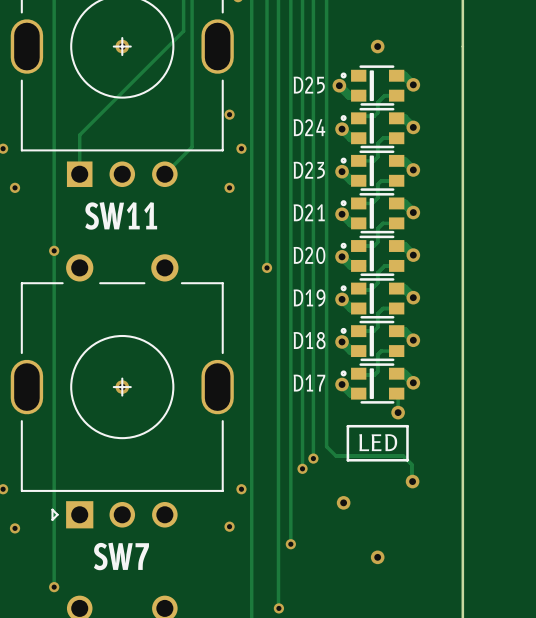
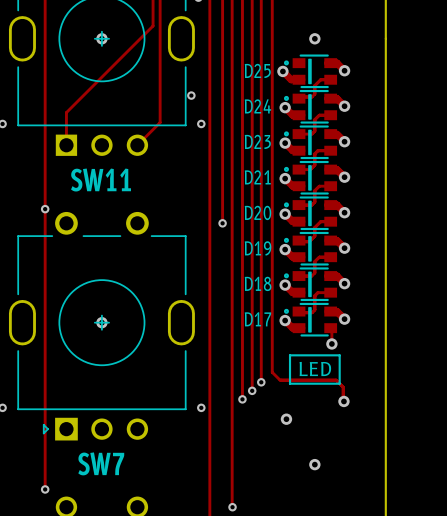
via: (15, 187) -> none
via: (229, 187) -> none
track: (290, 479) (290, 544) -> none
via: none -> (242, 399)
via: (229, 526) -> none
via: (15, 528) -> none
via: (290, 544) -> none

